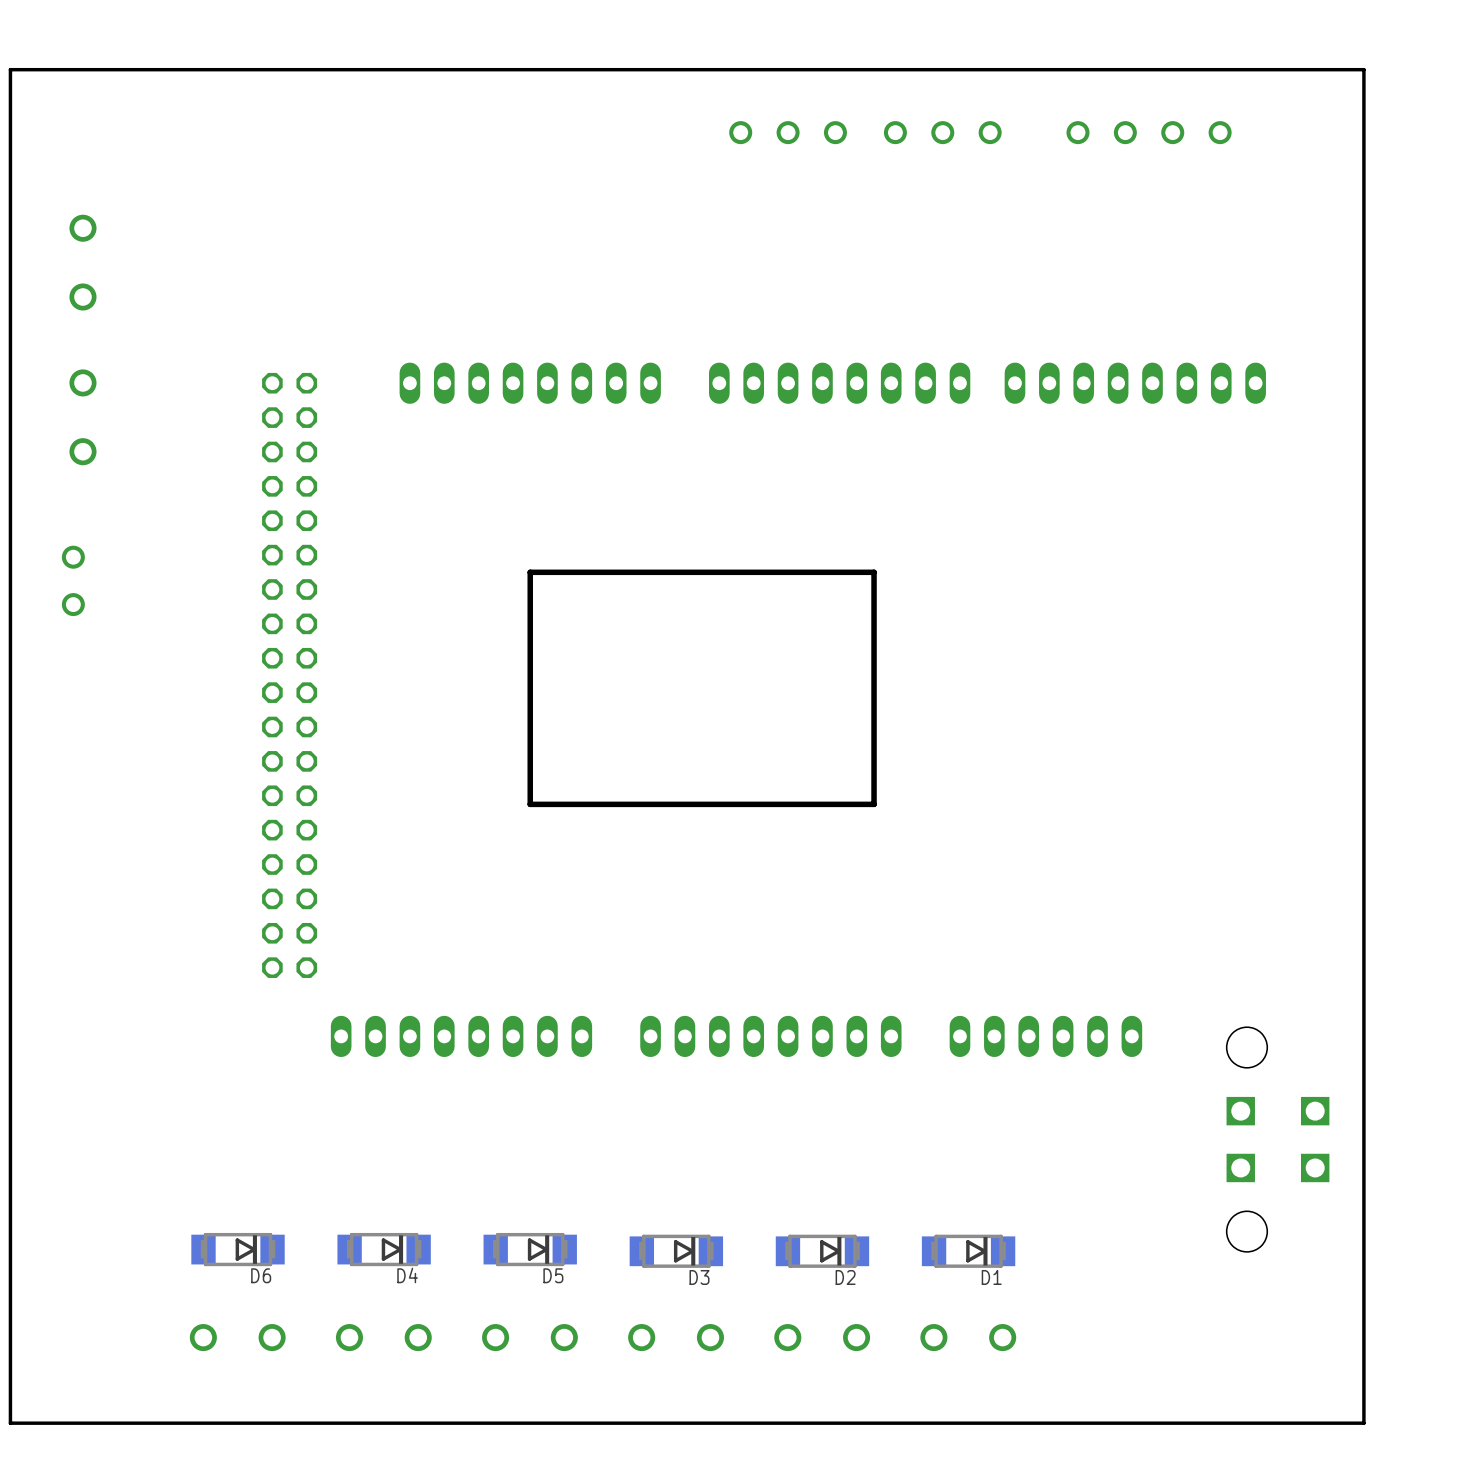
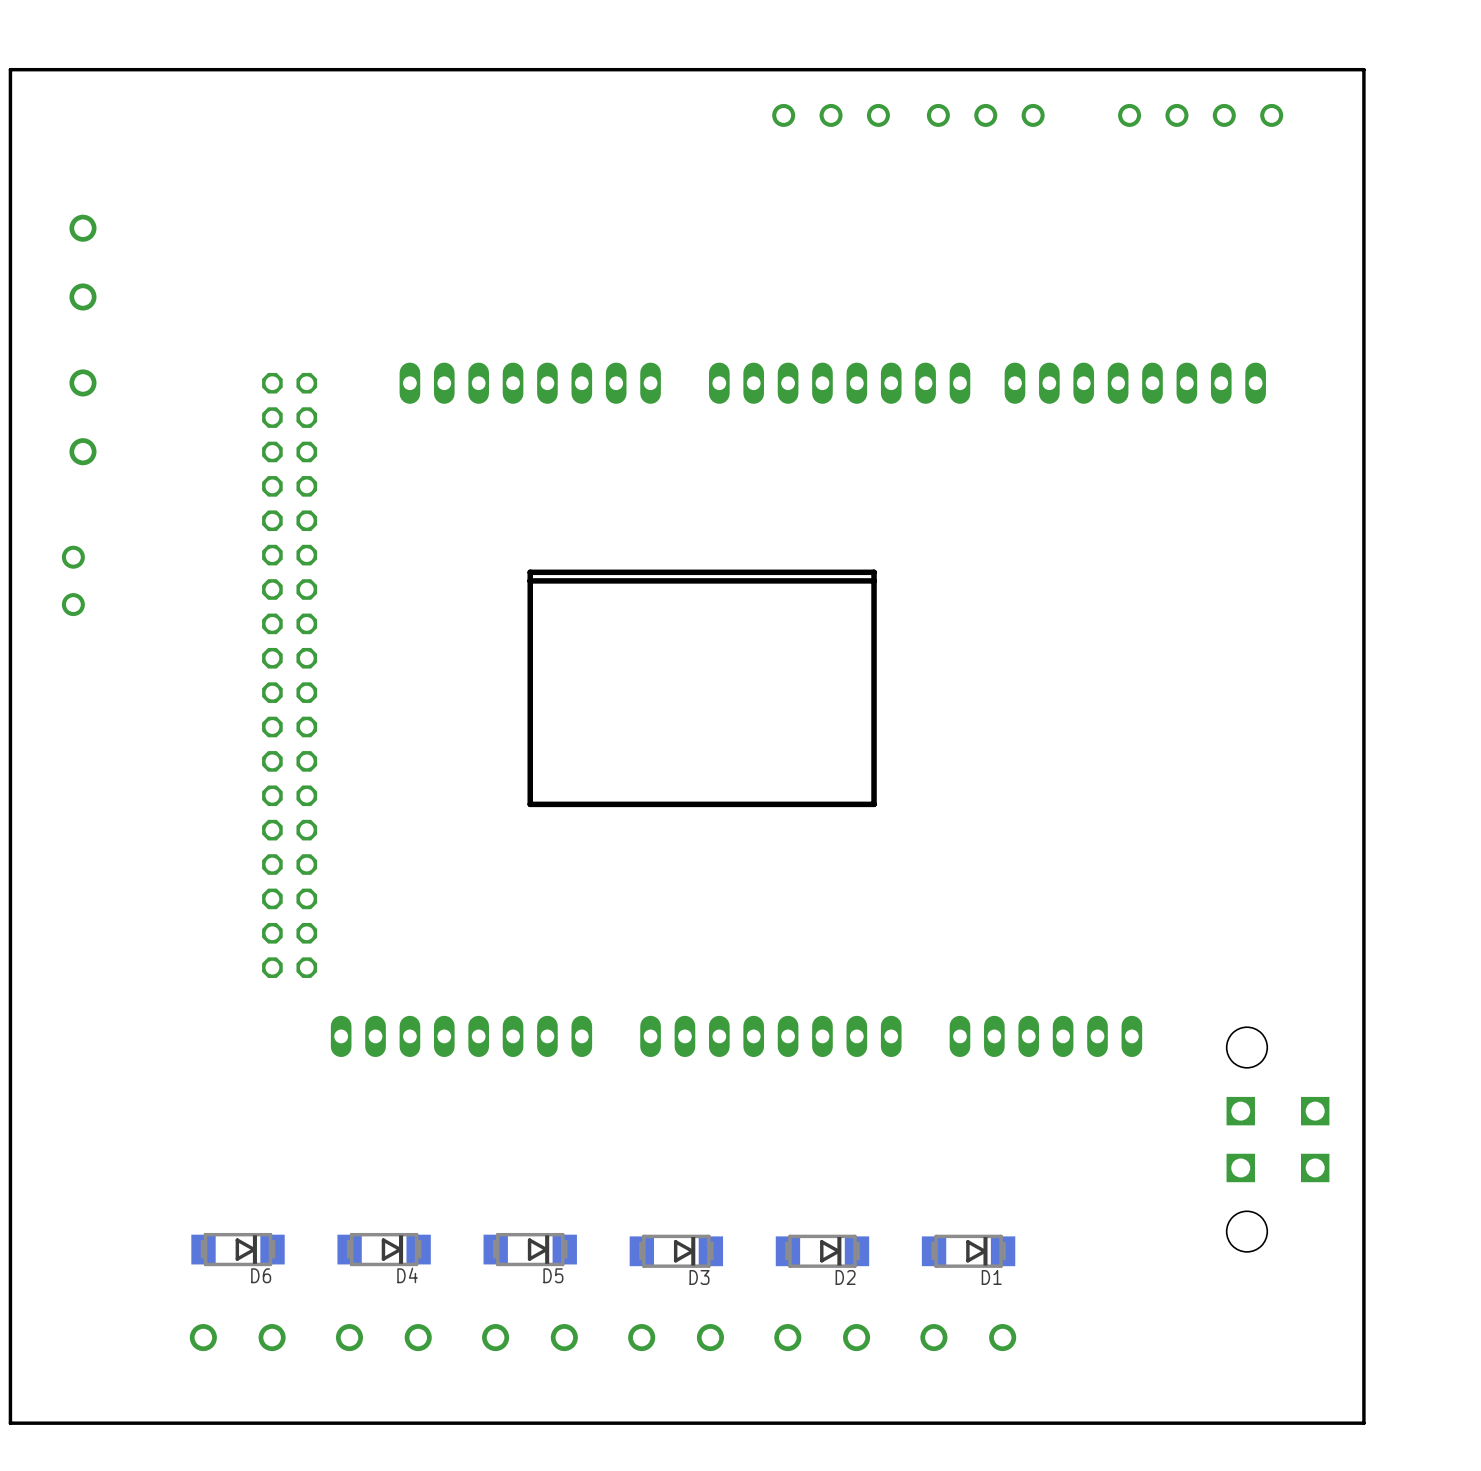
part position: (788, 132) -> (831, 115)
part position: (942, 132) -> (985, 115)
part position: (1149, 132) -> (1200, 115)
board edge: none -> (874, 580) (530, 580) (874, 580)

